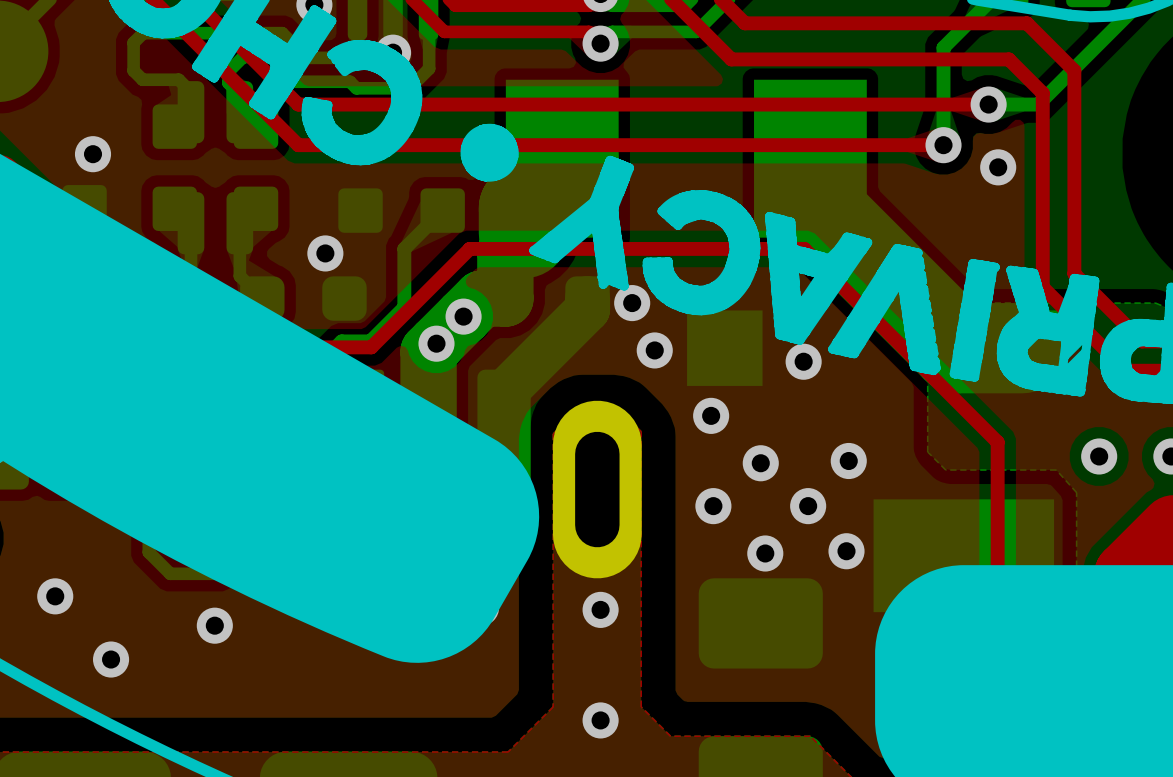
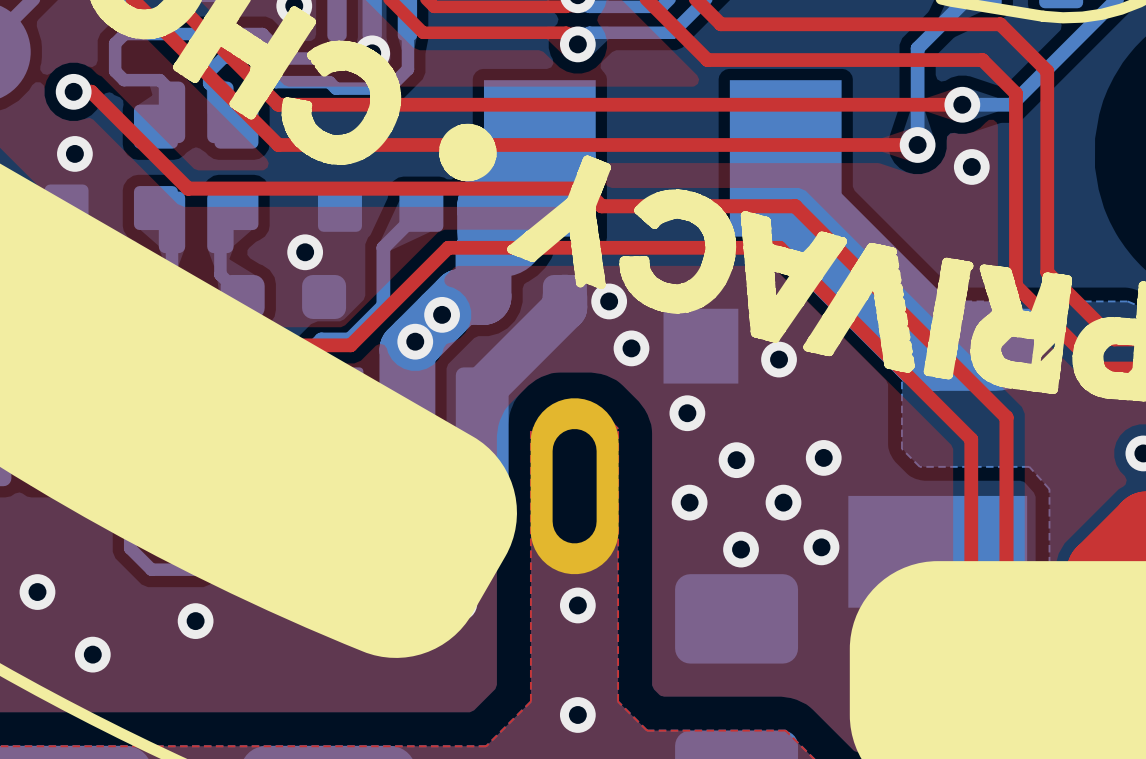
top track: none -> (73, 91) (91, 91) (188, 188) (584, 188) (601, 206) (795, 206) (1006, 417) (1006, 611) (1024, 628) (1024, 646)
via: none -> (73, 91)
via: (1099, 456) -> none

